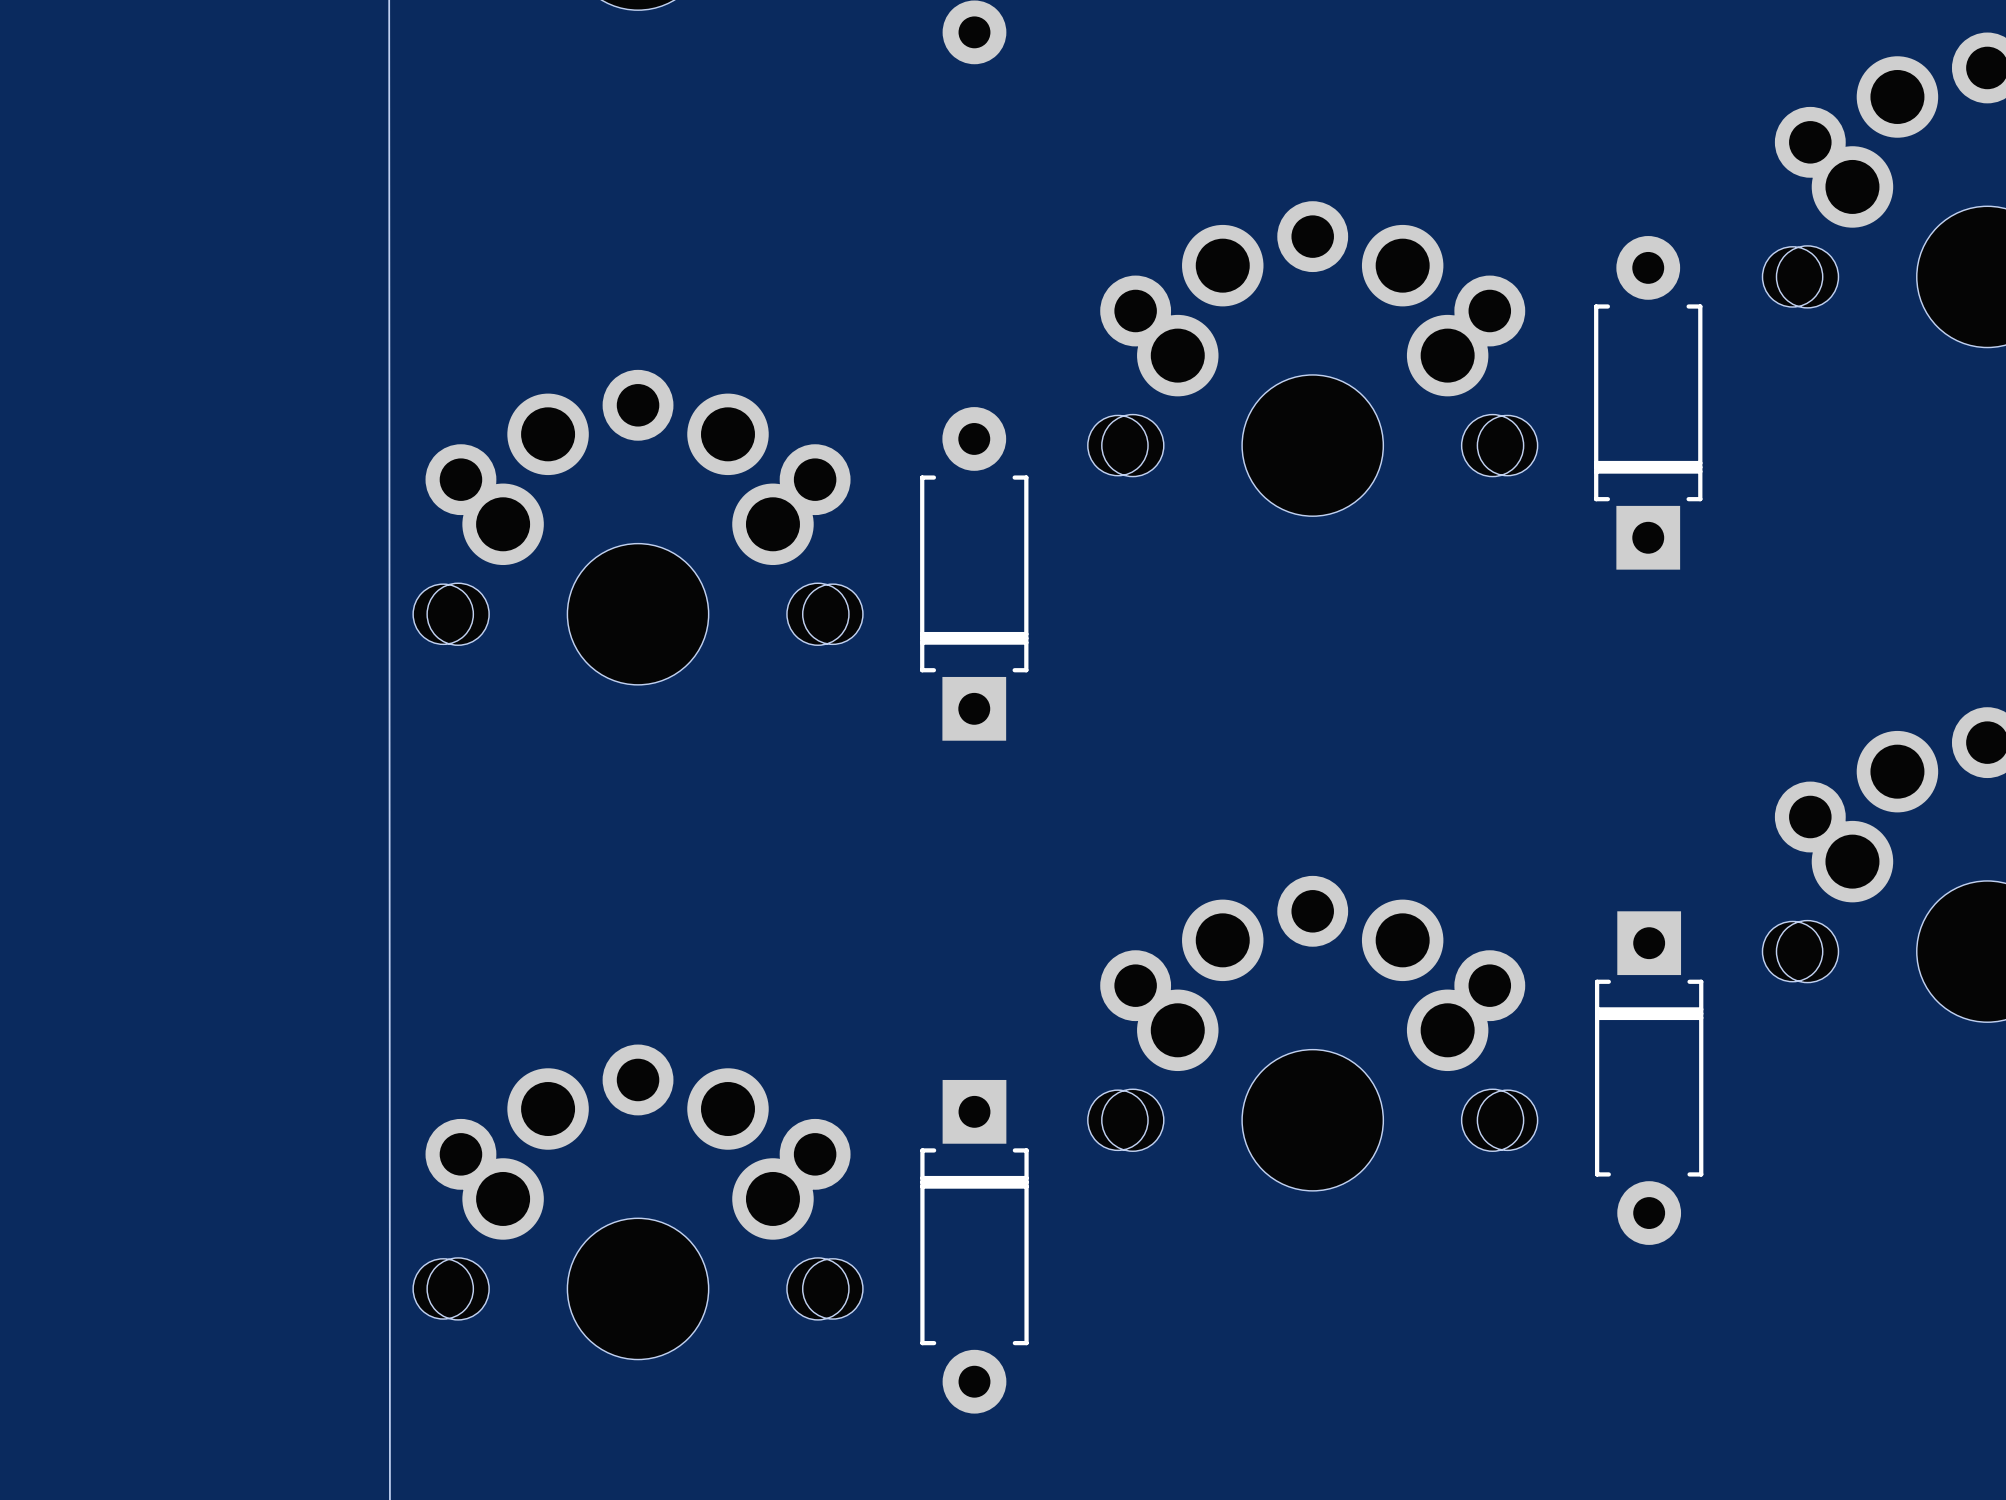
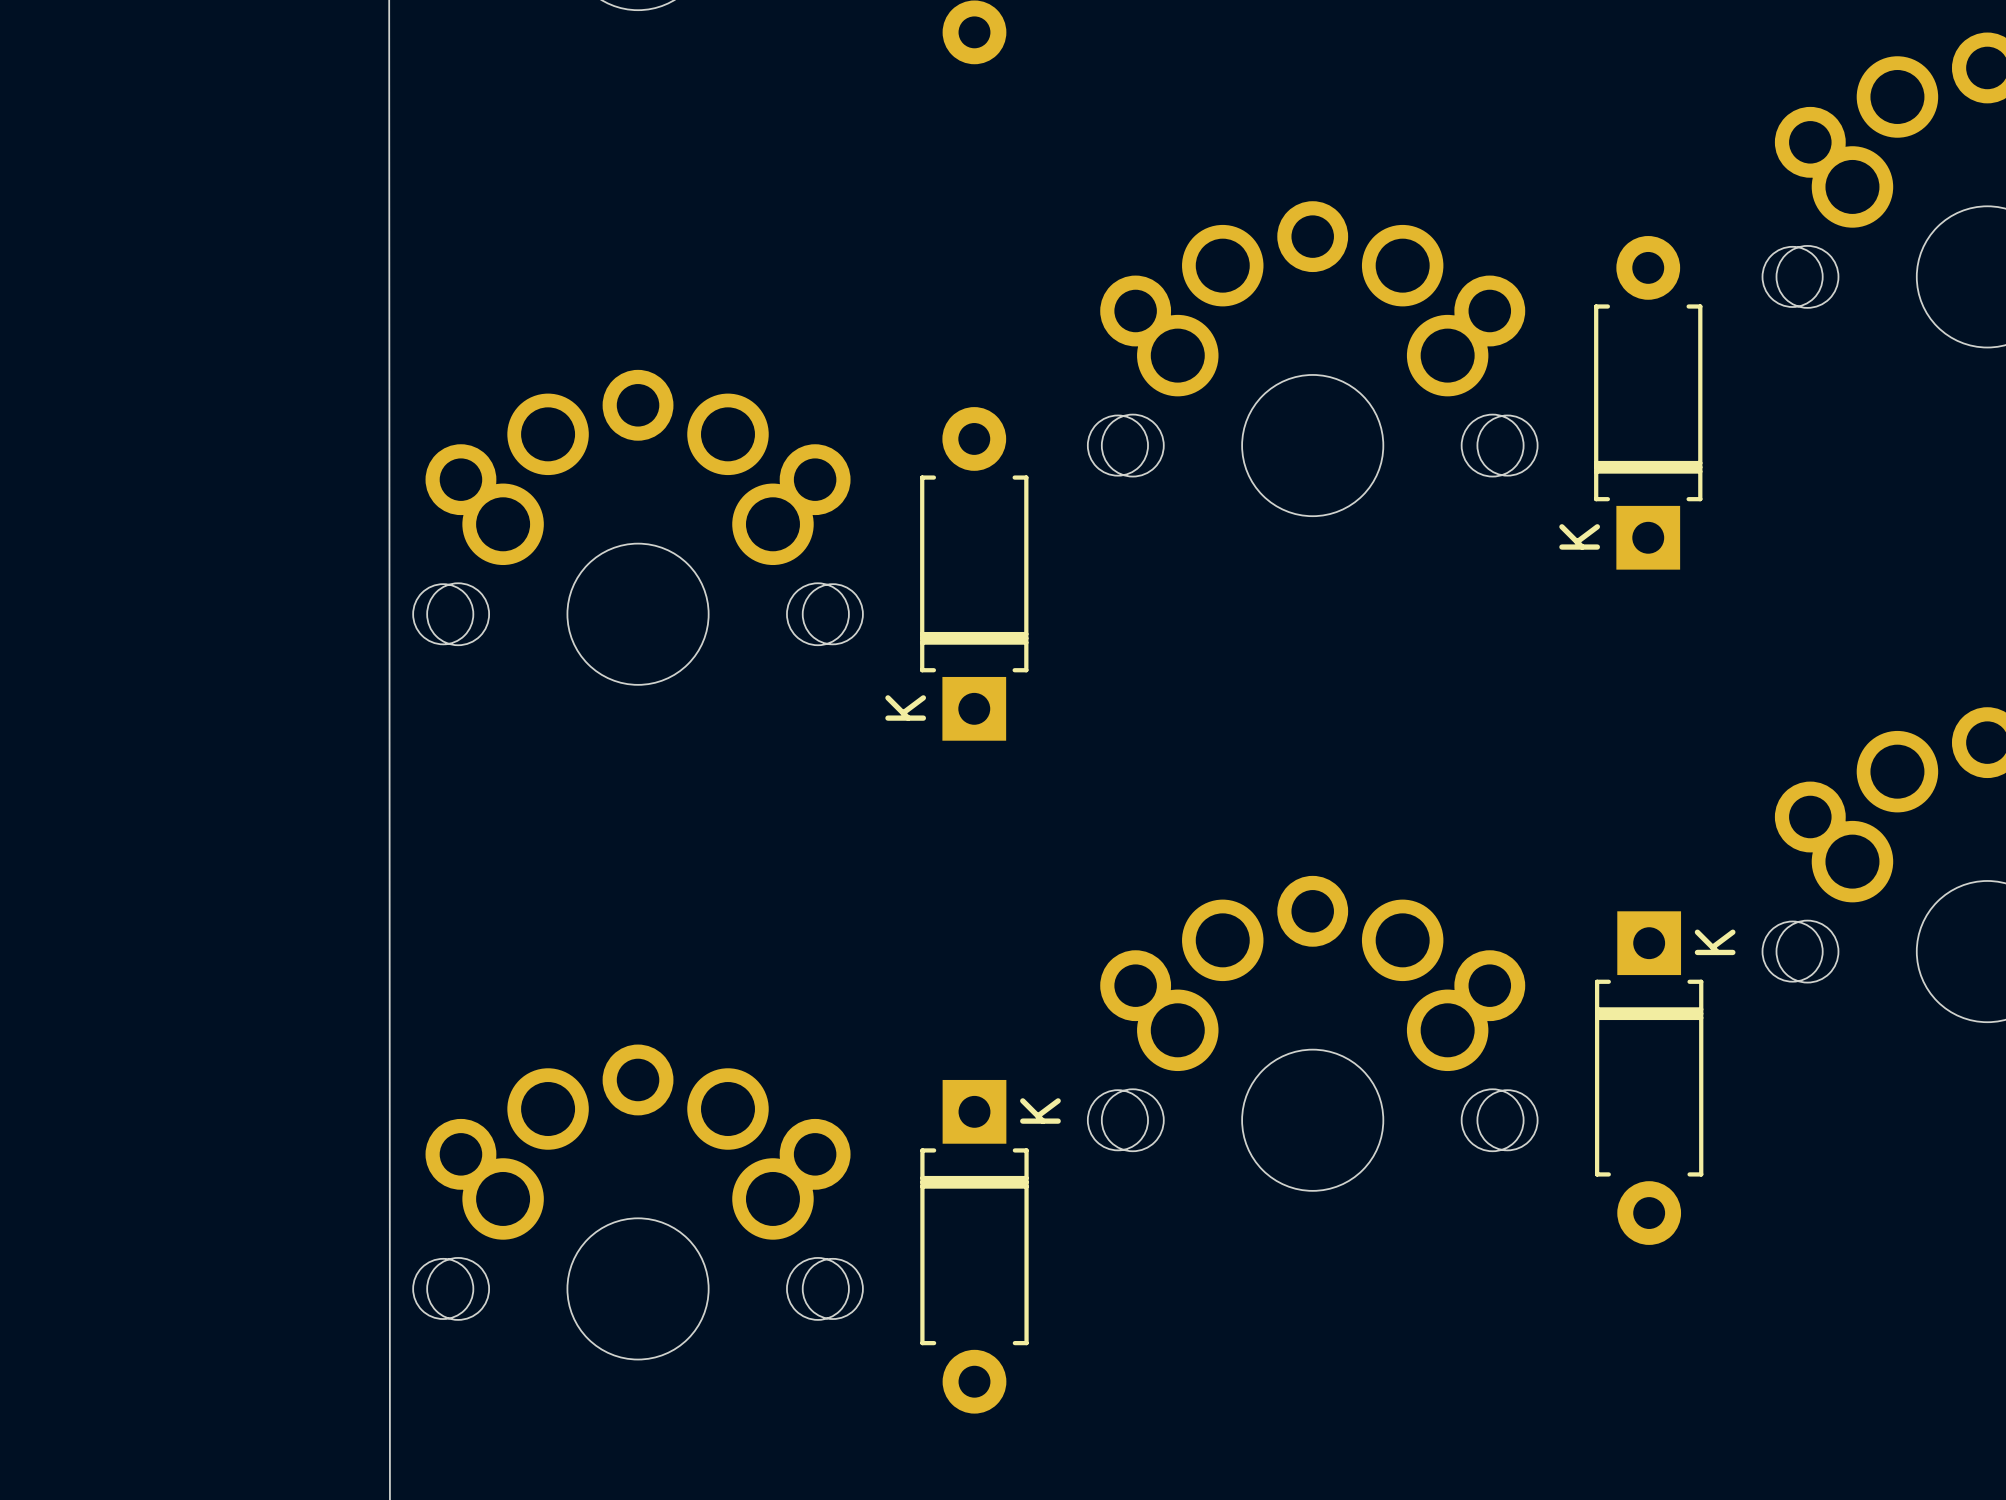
part text: none -> K (1579, 536)
part text: none -> K (905, 707)
part text: none -> K (1715, 942)
part text: none -> K (1040, 1111)

